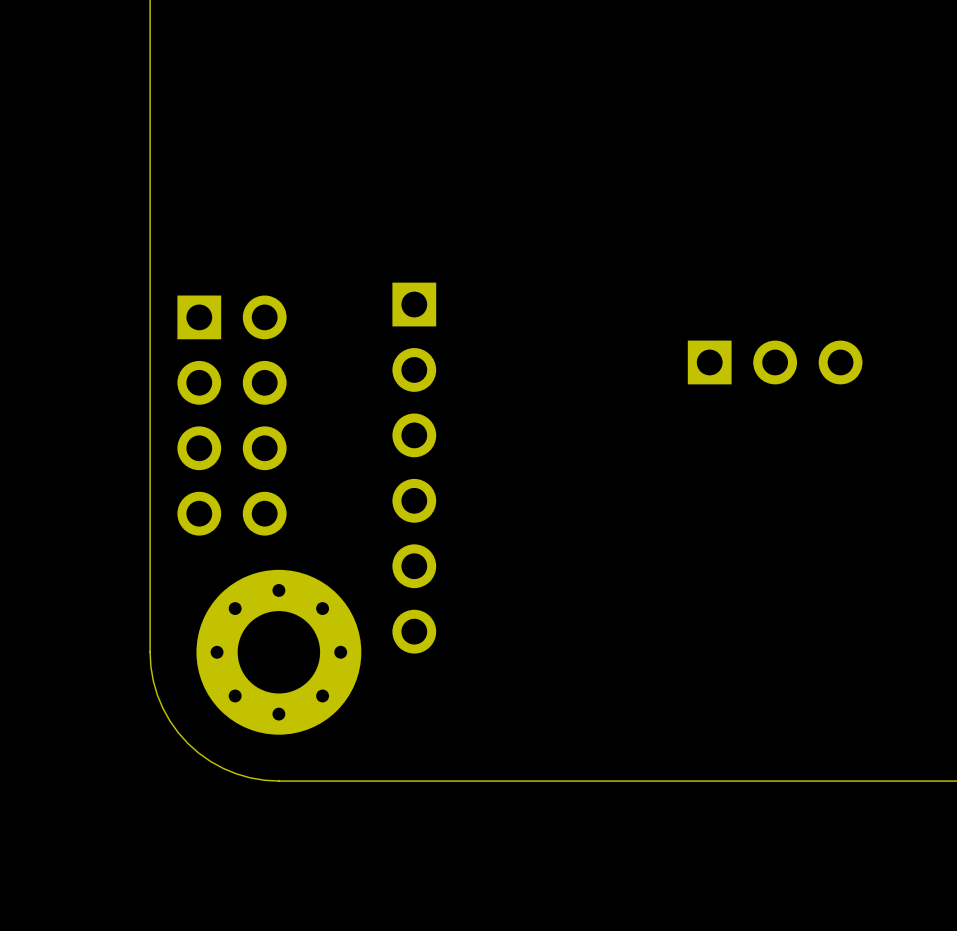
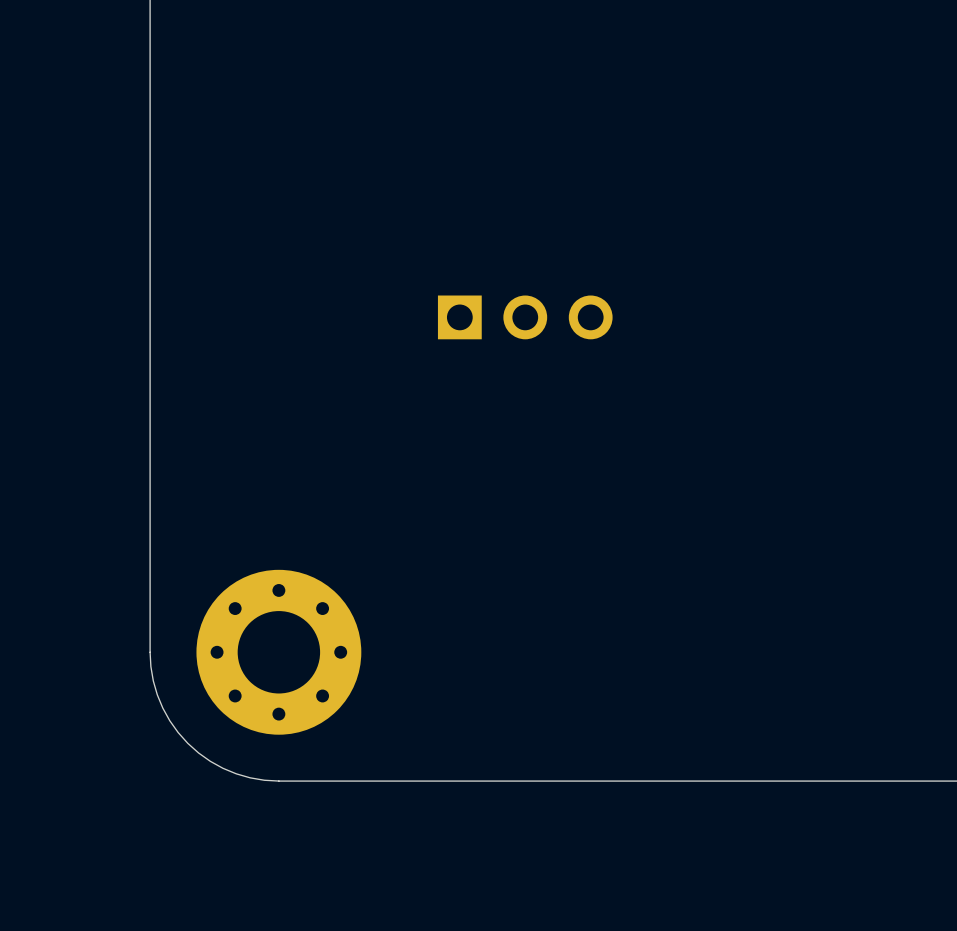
part position: (775, 362) -> (525, 317)
part: (232, 415) -> none
part: (414, 468) -> none

